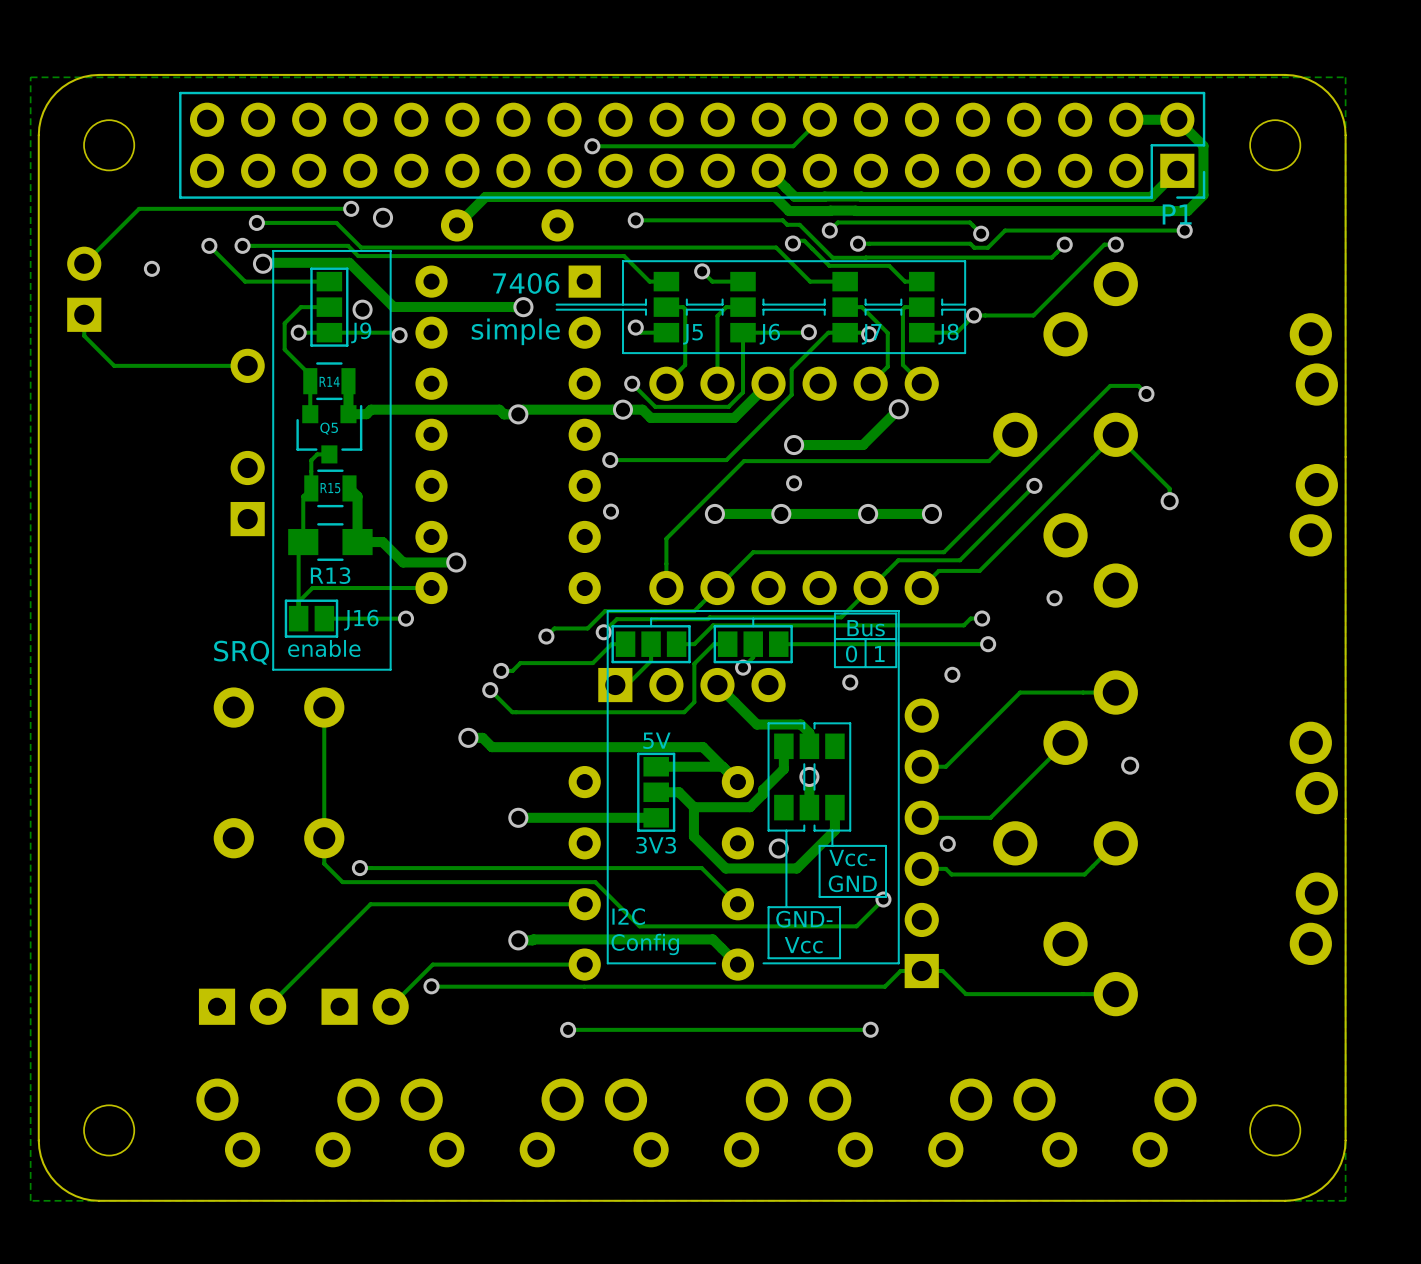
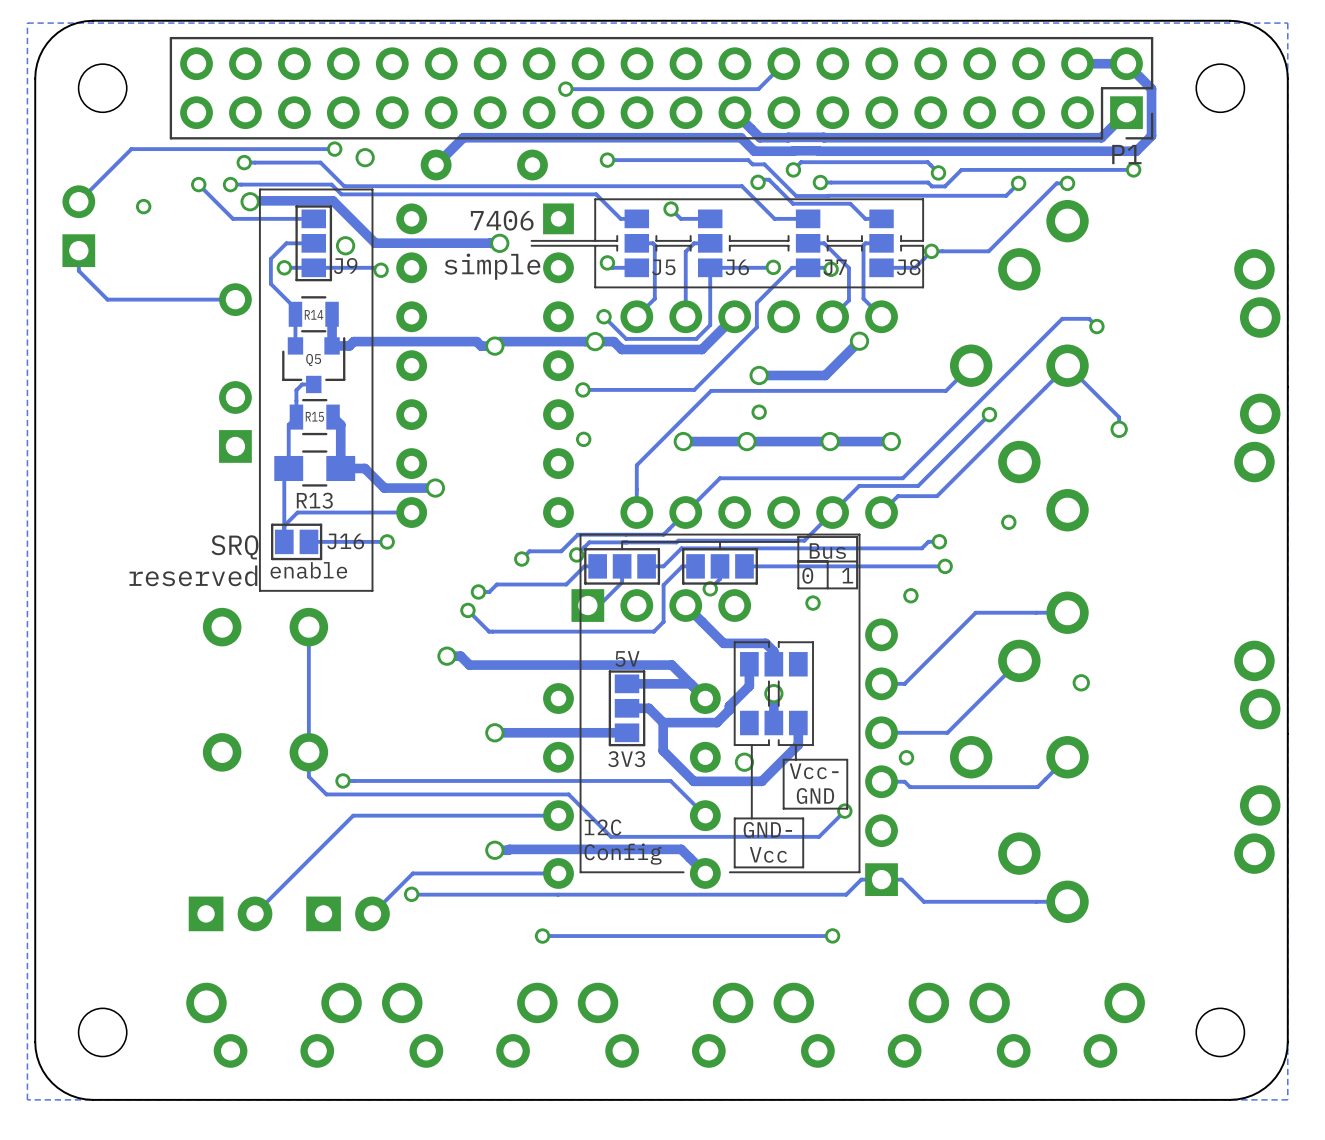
text: none -> SRQ (234, 547)
text: SRQ (241, 652) -> reserved (193, 575)

